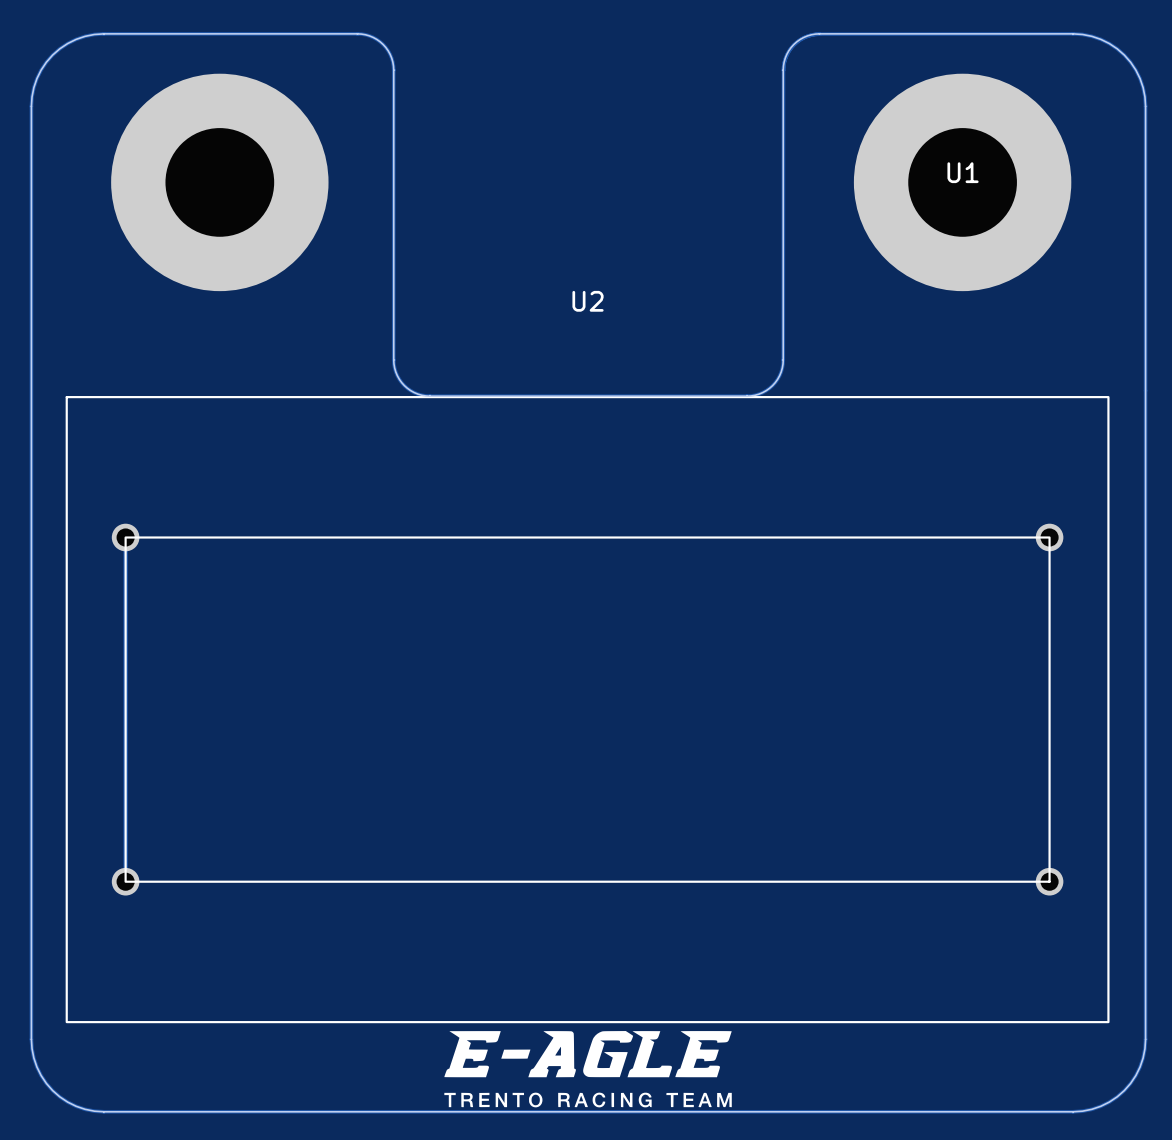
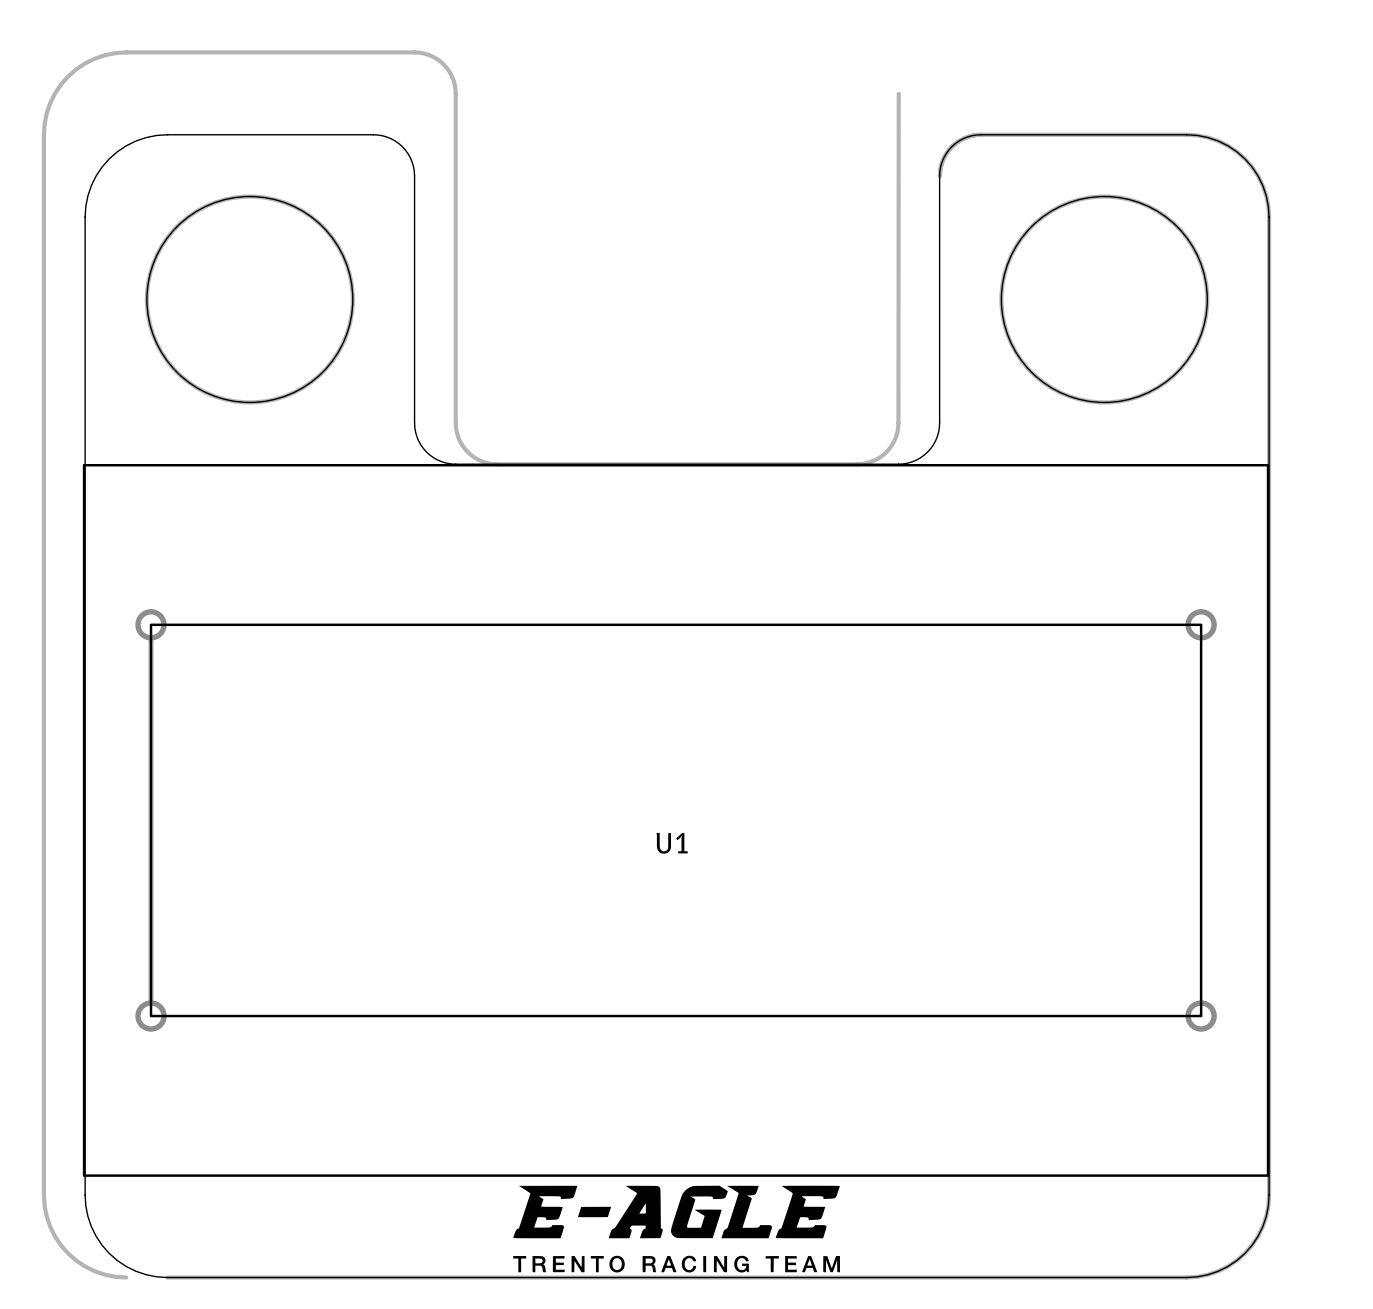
track: (819, 34) (1082, 34) (1100, 39) (1117, 48) (1130, 62) (1143, 87) (1145, 106) (1144, 1048) (1140, 1067) (1130, 1083) (1109, 1102) (1082, 1111) (1036, 1111) -> (981, 134) (1186, 134) (1208, 137) (1227, 145) (1244, 158) (1258, 175) (1268, 206) (1268, 1205) (1258, 1236) (1244, 1253) (1218, 1271) (1186, 1277)
track: (819, 34) (804, 37) (794, 44) (787, 54) (783, 70) (784, 62) (787, 54) (791, 47) (794, 44) (797, 42) (804, 37) (811, 35) (819, 34) -> (981, 134) (967, 137) (951, 146) (942, 162) (939, 175) (940, 166) (942, 162) (946, 154) (951, 146) (959, 141) (967, 137) (976, 135) (981, 134)
drawing: none -> [144, 194, 355, 405]
drawing: none -> [999, 194, 1210, 405]
round board edge: none -> [146, 196, 354, 403]
round board edge: none -> [1000, 196, 1208, 403]
U1: (591, 182) -> none
U2 name: U2 (588, 301) -> U1 (672, 843)
board edge: (429, 396) (418, 394) (407, 388) (397, 375) (393, 364) (393, 70) (390, 54) (383, 44) (369, 35) (357, 33) (103, 33) (76, 39) (52, 55) (36, 78) (31, 106) (32, 1048) (41, 1075) (52, 1090) (67, 1102) (94, 1111) (140, 1111) -> (496, 464) (455, 464) (442, 461) (426, 452) (416, 436) (414, 423) (414, 171) (408, 154) (399, 143) (386, 137) (373, 134) (156, 135) (126, 145) (102, 166) (91, 185) (85, 217) (85, 1195) (91, 1226) (109, 1253) (135, 1271) (167, 1277)
board edge: (747, 396) (762, 392) (772, 385) (779, 375) (783, 364) (783, 70) (786, 54) (793, 44) (807, 35) (819, 33) (1073, 33) (1100, 39) (1124, 55) (1140, 78) (1145, 106) (1144, 1048) (1140, 1067) (1130, 1083) (1109, 1102) (1082, 1111) (1036, 1111) -> (857, 464) (898, 464) (912, 461) (927, 452) (937, 436) (939, 423) (939, 171) (945, 154) (955, 143) (967, 137) (980, 134) (1197, 135) (1227, 145) (1252, 166) (1262, 185) (1269, 217) (1269, 1195) (1262, 1226) (1244, 1253) (1218, 1271) (1186, 1277)
track: (103, 1111) (140, 1111) -> none

